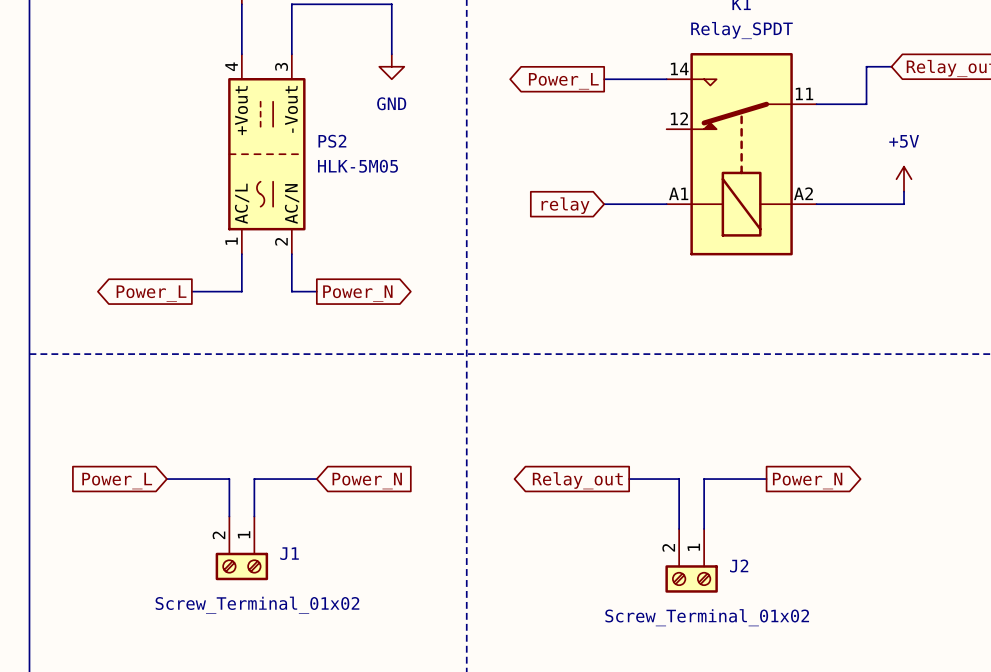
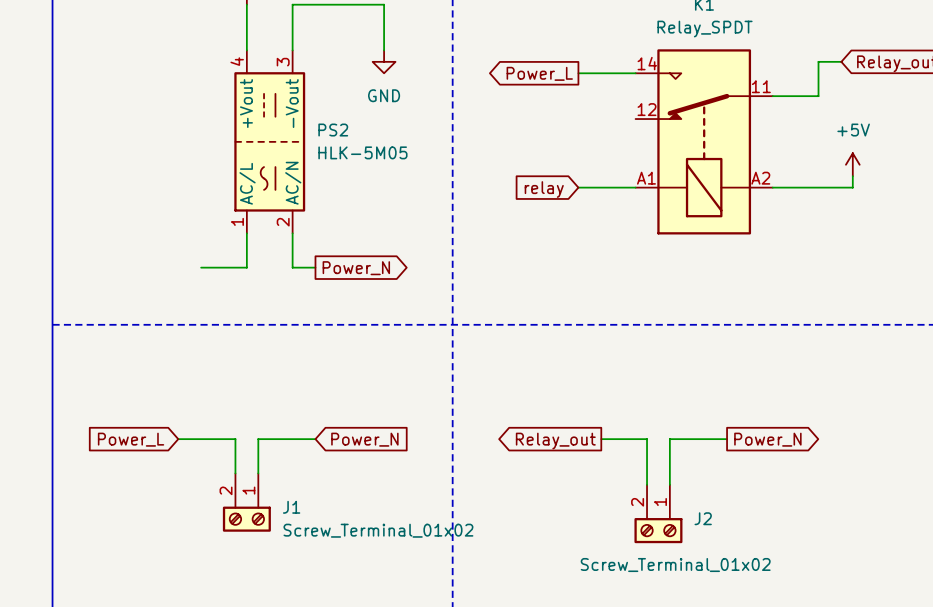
global label: Power_L (151, 293) -> none
J1 value position: Screw_Terminal_01x02 (257, 605) -> Screw_Terminal_01x02 (378, 530)

